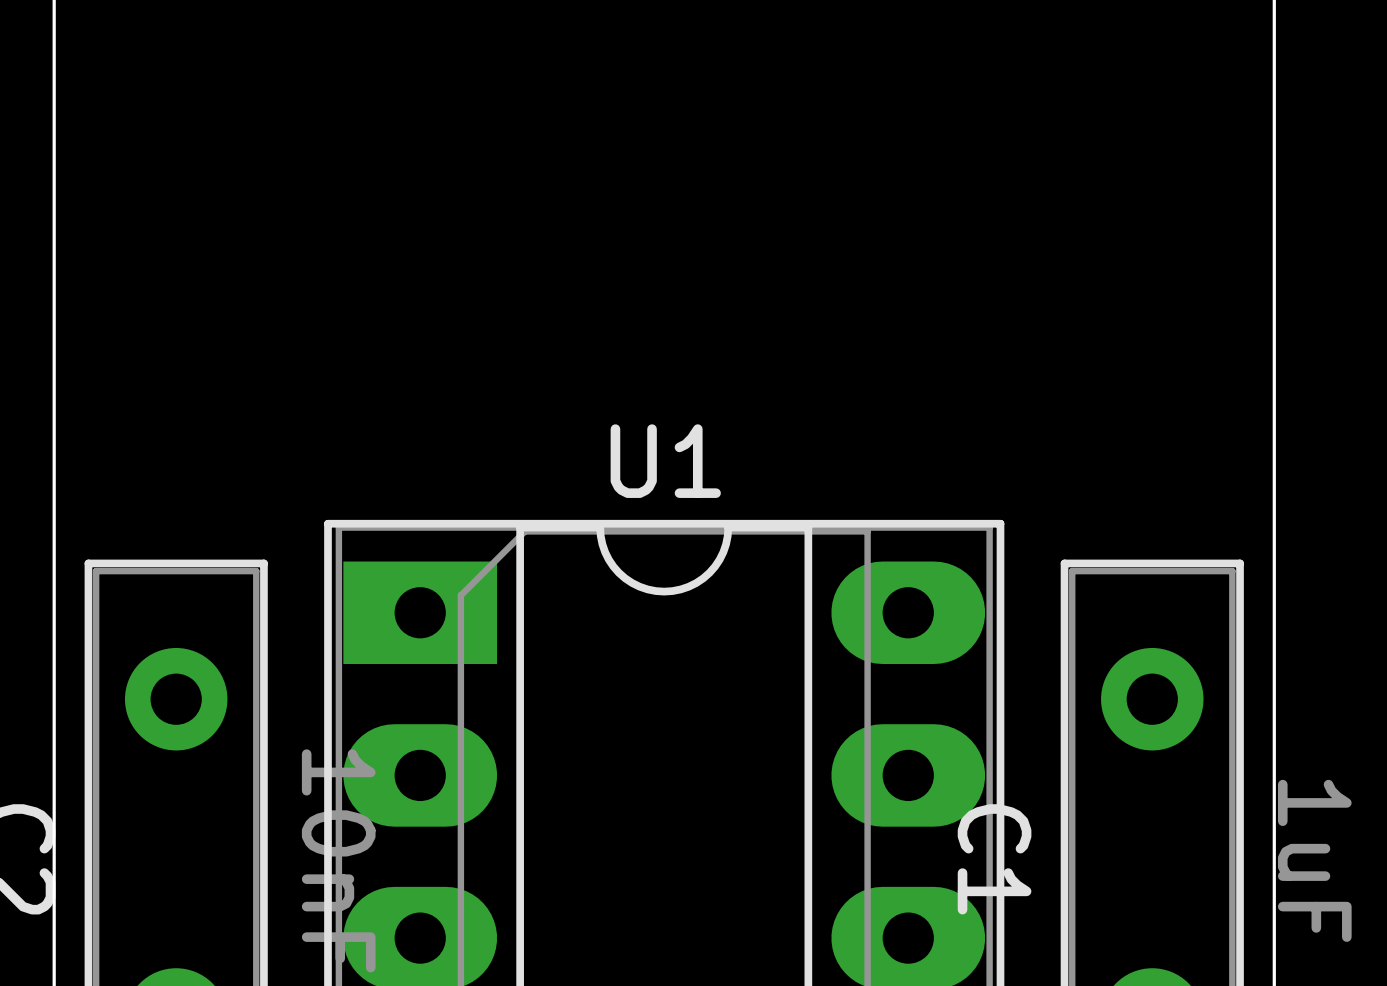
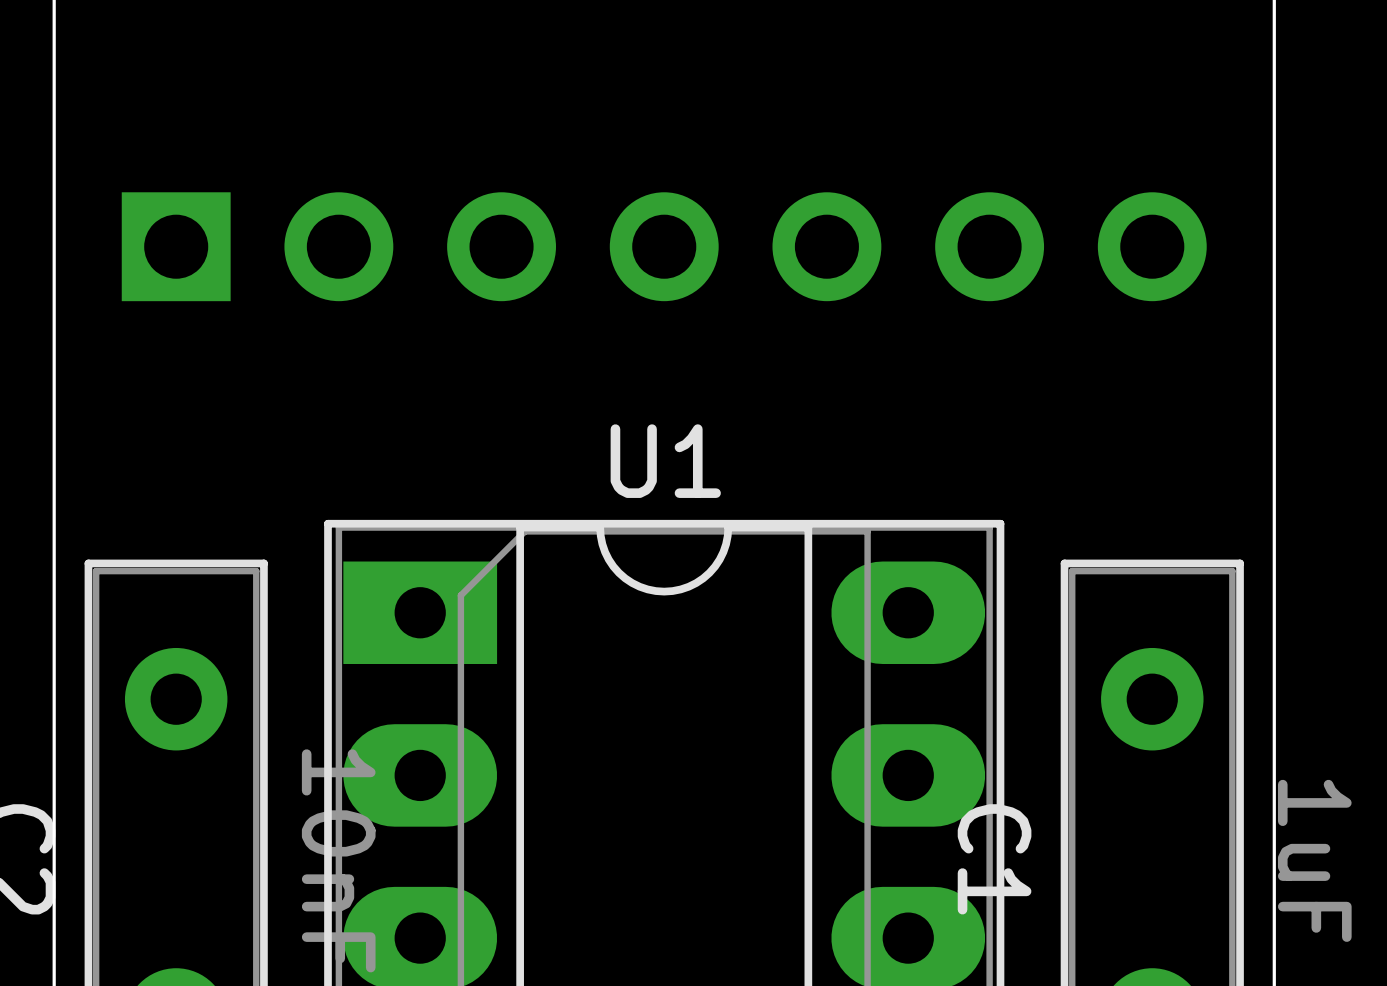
part: none -> (664, 246)

